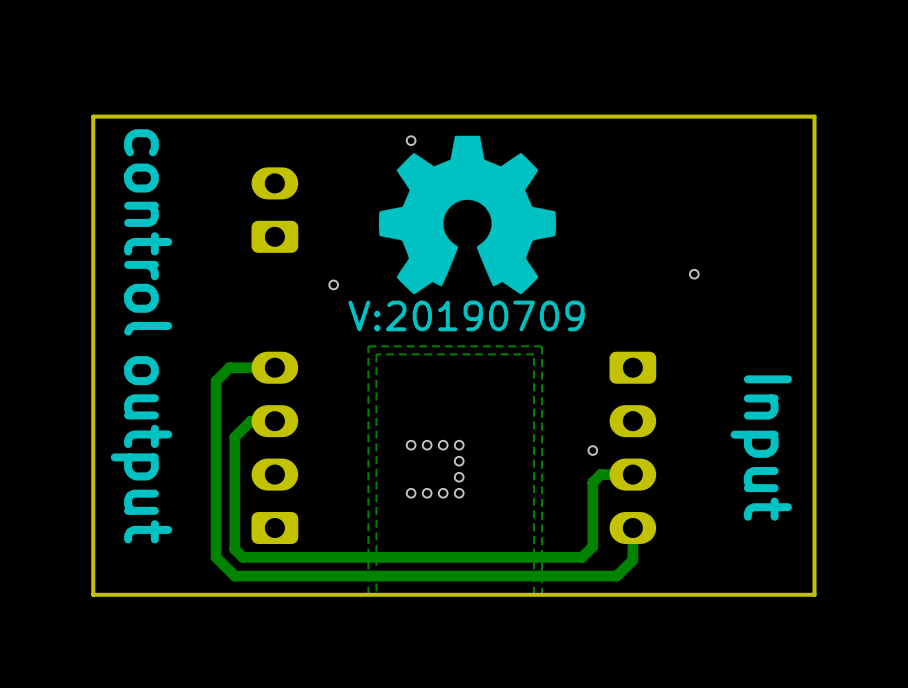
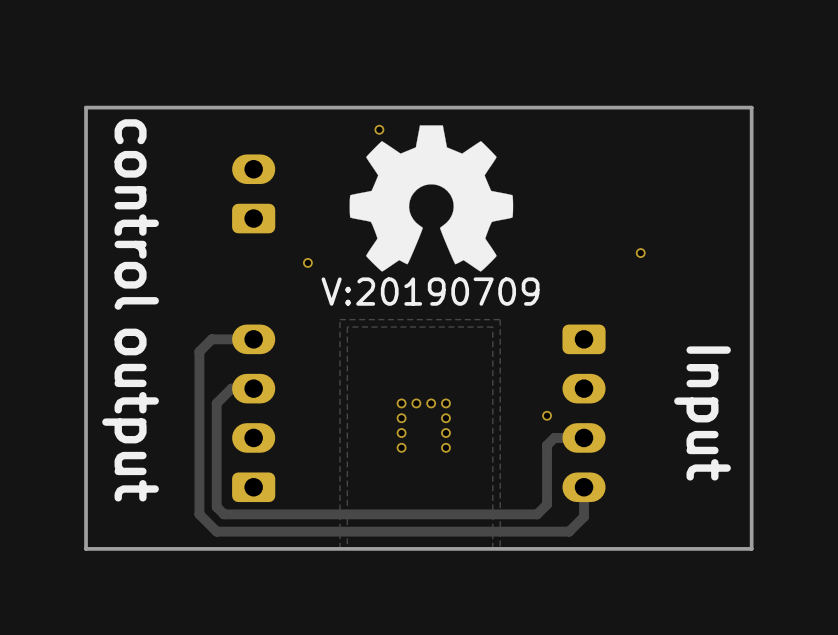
via: none -> (401, 403)
via: none -> (416, 403)
via: none -> (431, 403)
via: none -> (445, 403)
via: (411, 445) -> none
via: (427, 445) -> none
via: (443, 445) -> none
via: (459, 445) -> none
via: none -> (401, 418)
via: none -> (445, 418)
via: (459, 461) -> none
via: none -> (401, 433)
via: none -> (445, 433)
via: (459, 477) -> none
via: none -> (401, 447)
via: none -> (445, 447)
via: (411, 493) -> none
via: (427, 493) -> none
via: (443, 493) -> none
via: (459, 493) -> none

